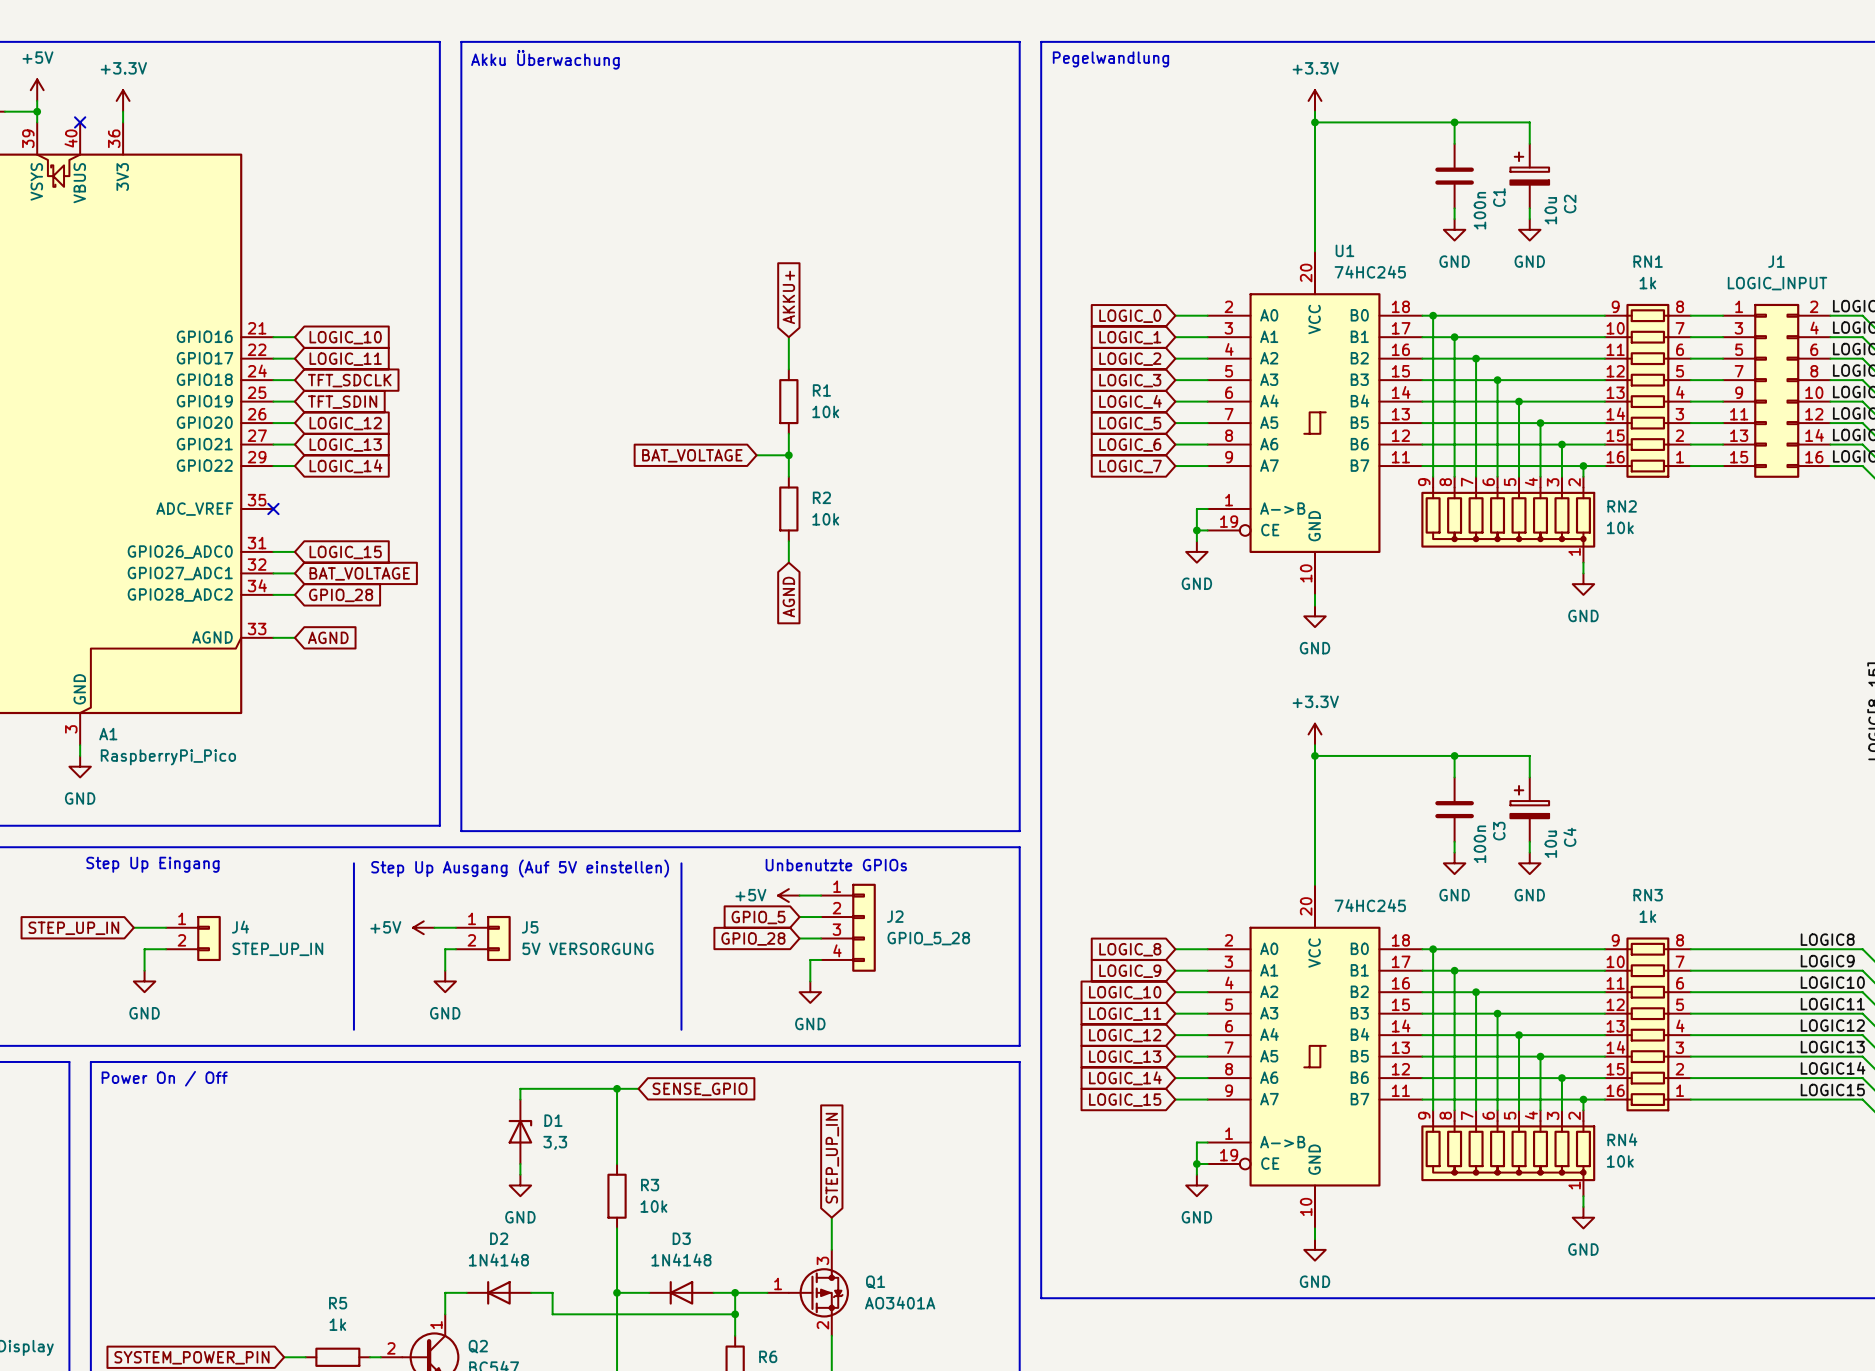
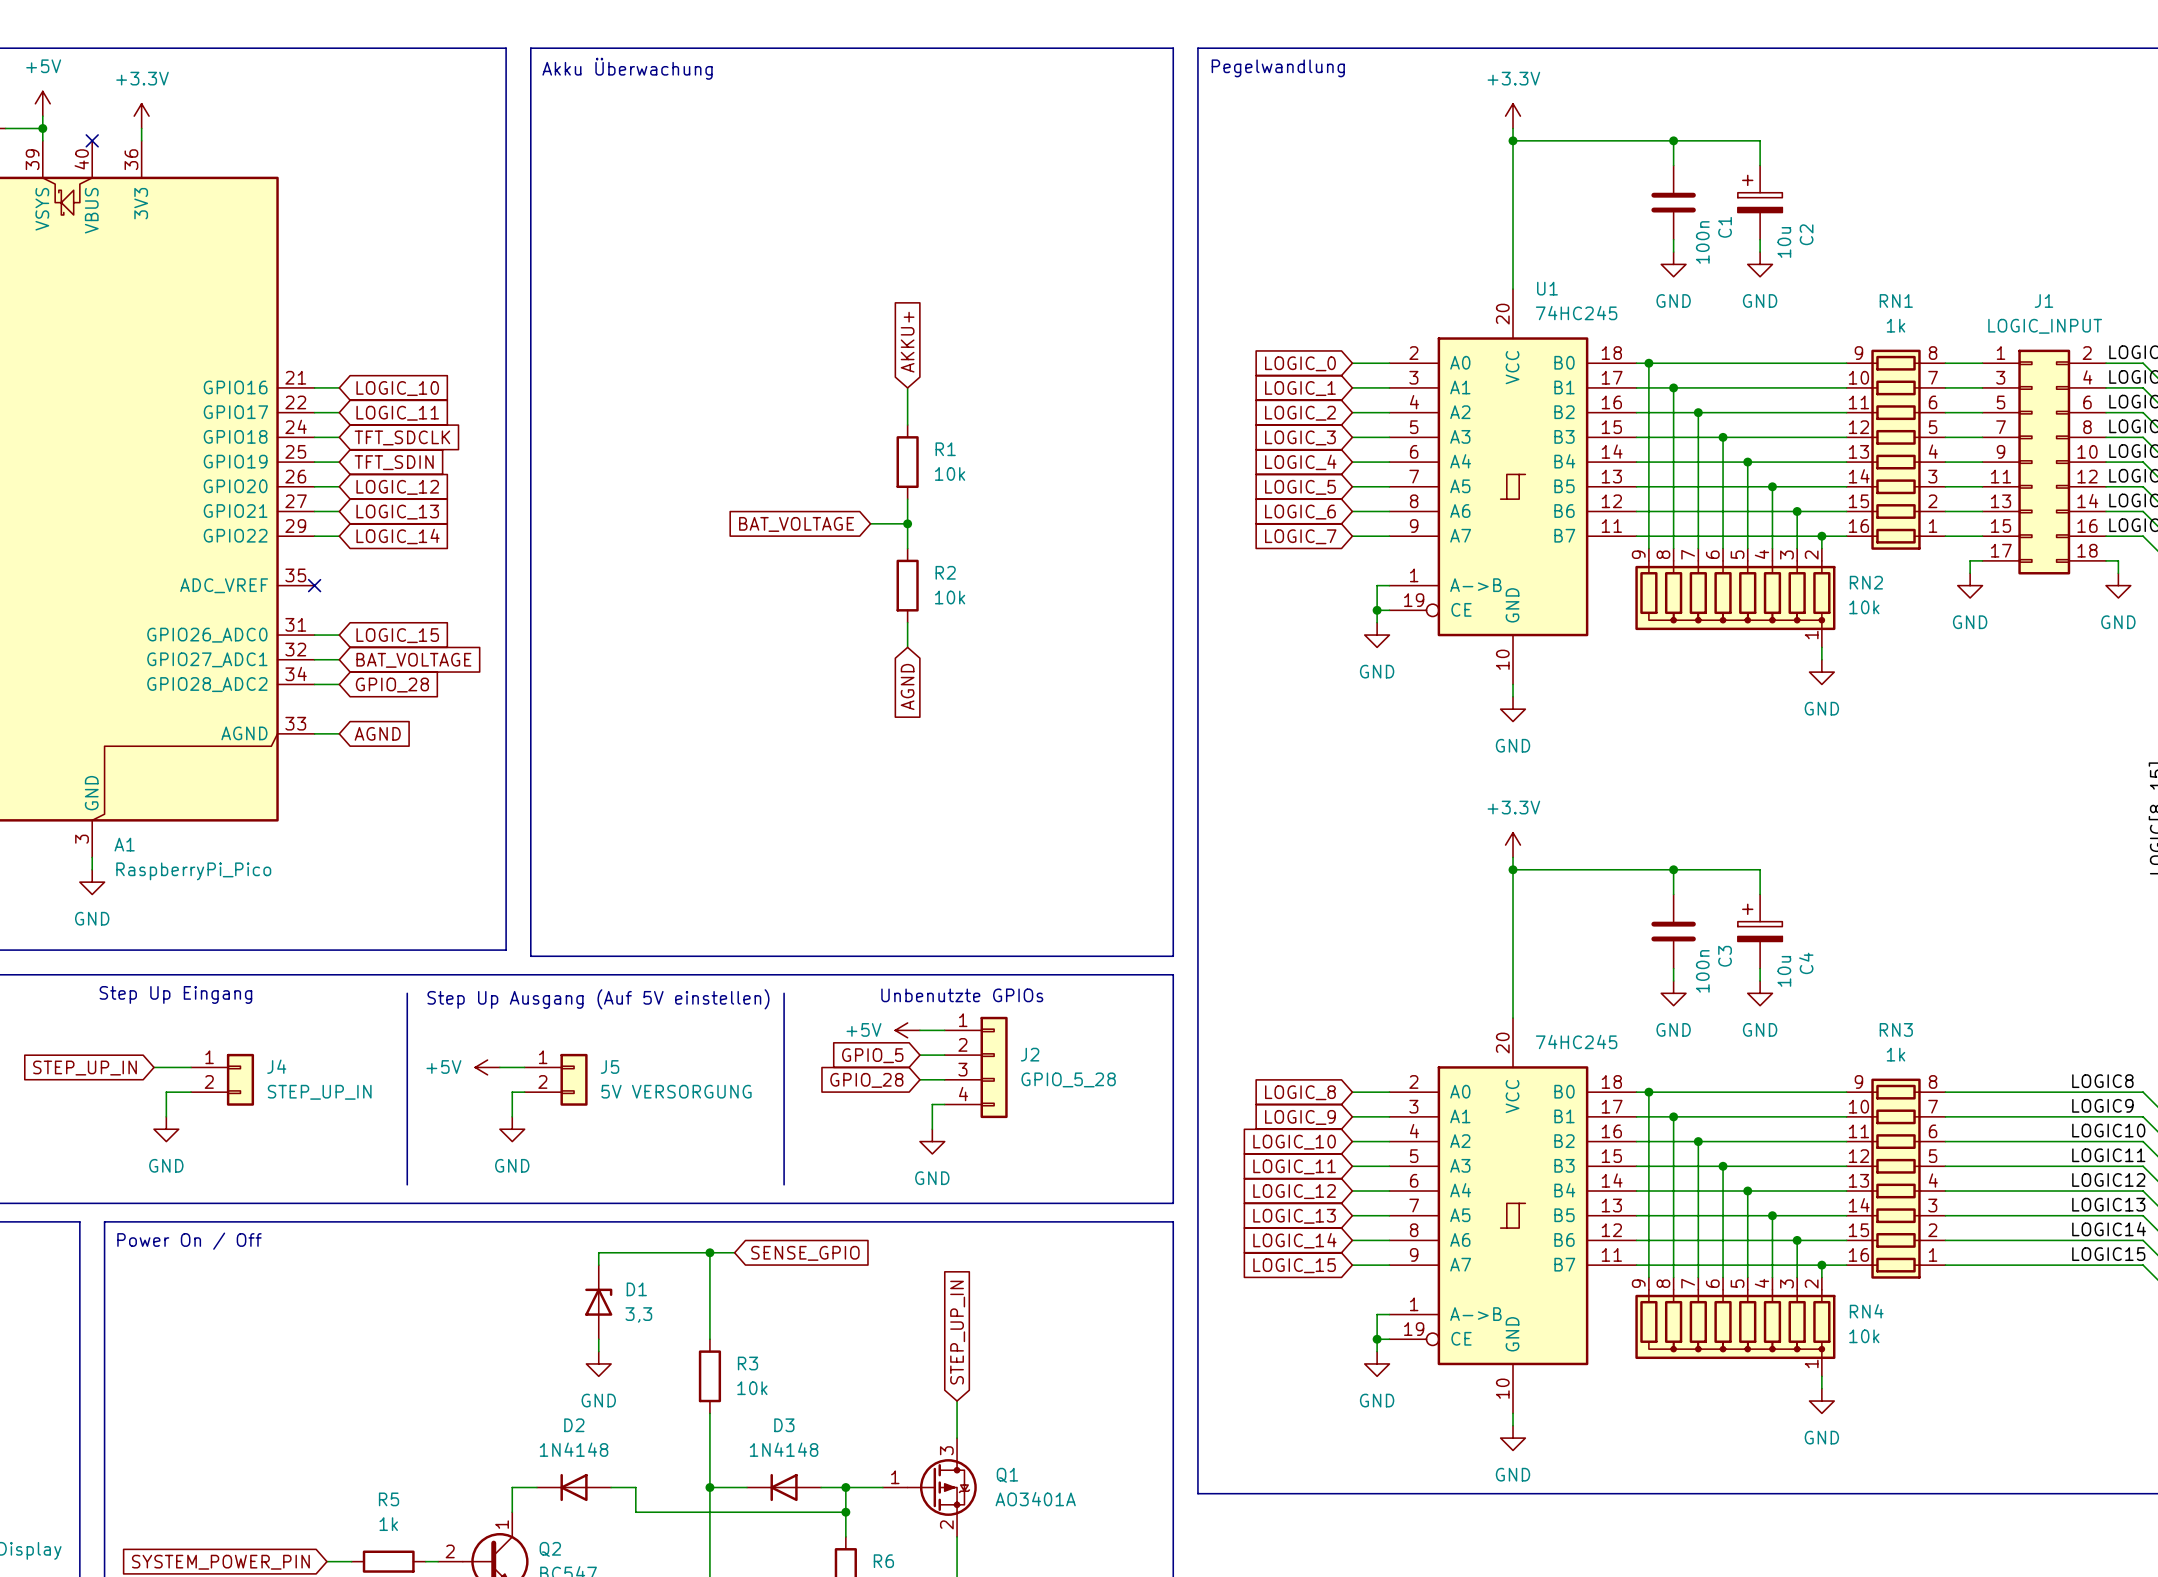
J1 symbol: [1723, 303, 1831, 478] -> [1982, 349, 2107, 575]
wire: none -> (1982, 560) (1970, 560) (1970, 573)
wire: none -> (2106, 560) (2118, 560) (2118, 573)
power symbol: none -> GND (1970, 585)
power symbol: none -> GND (2118, 585)

